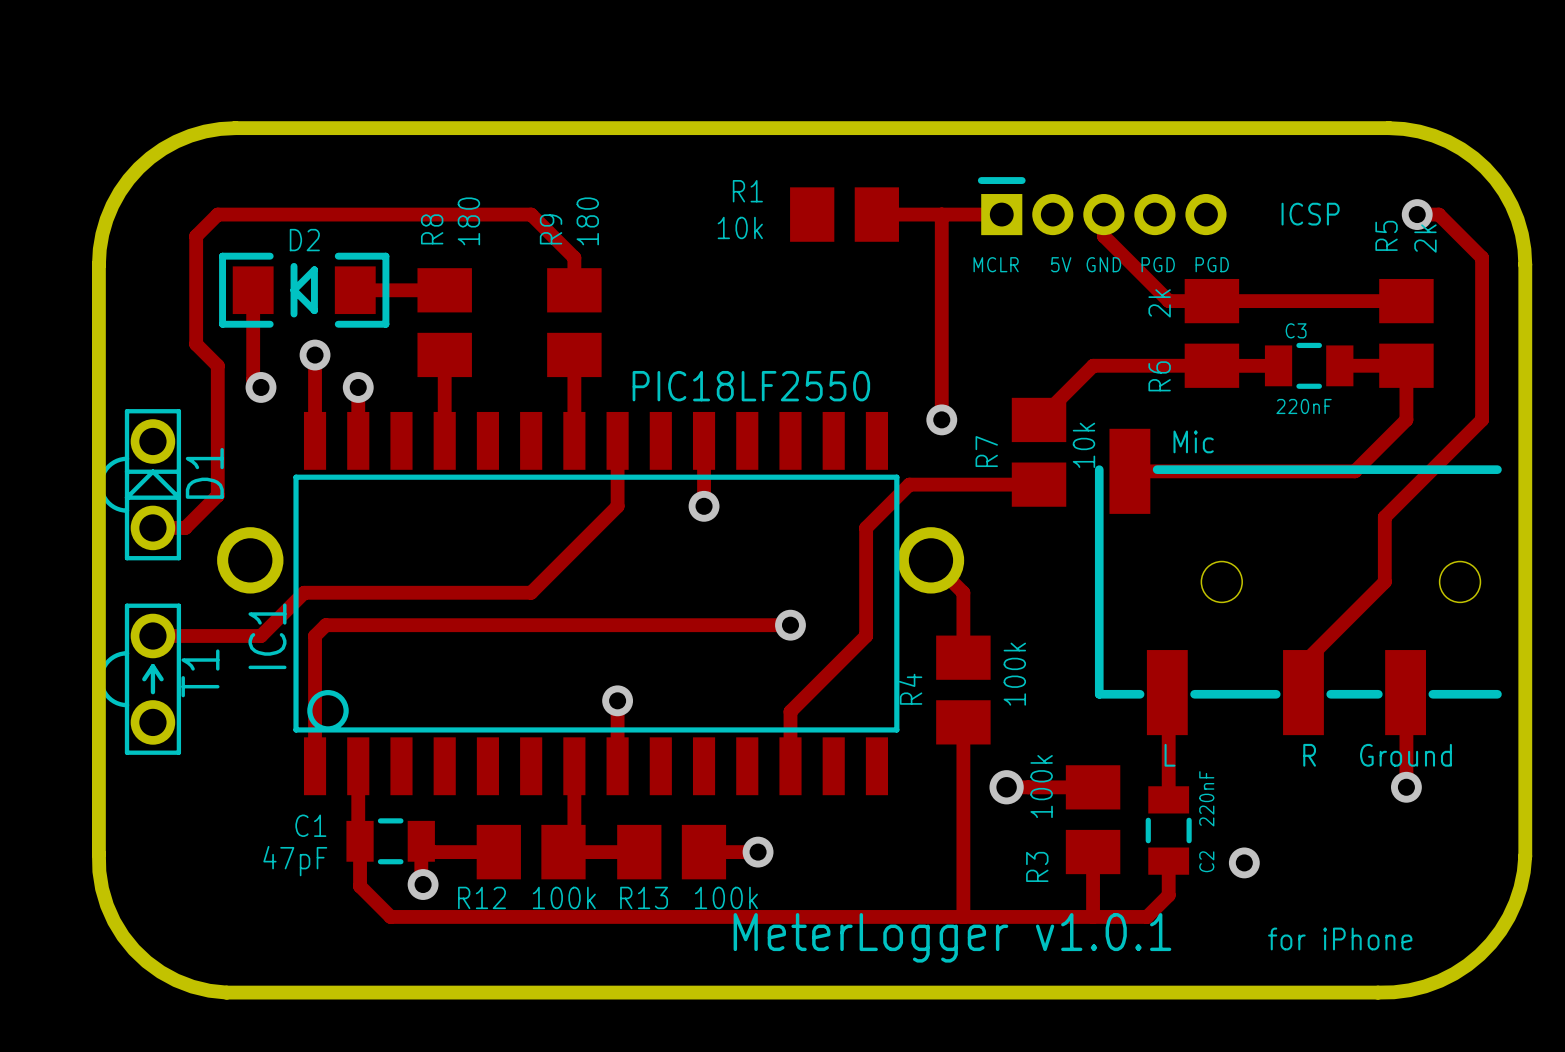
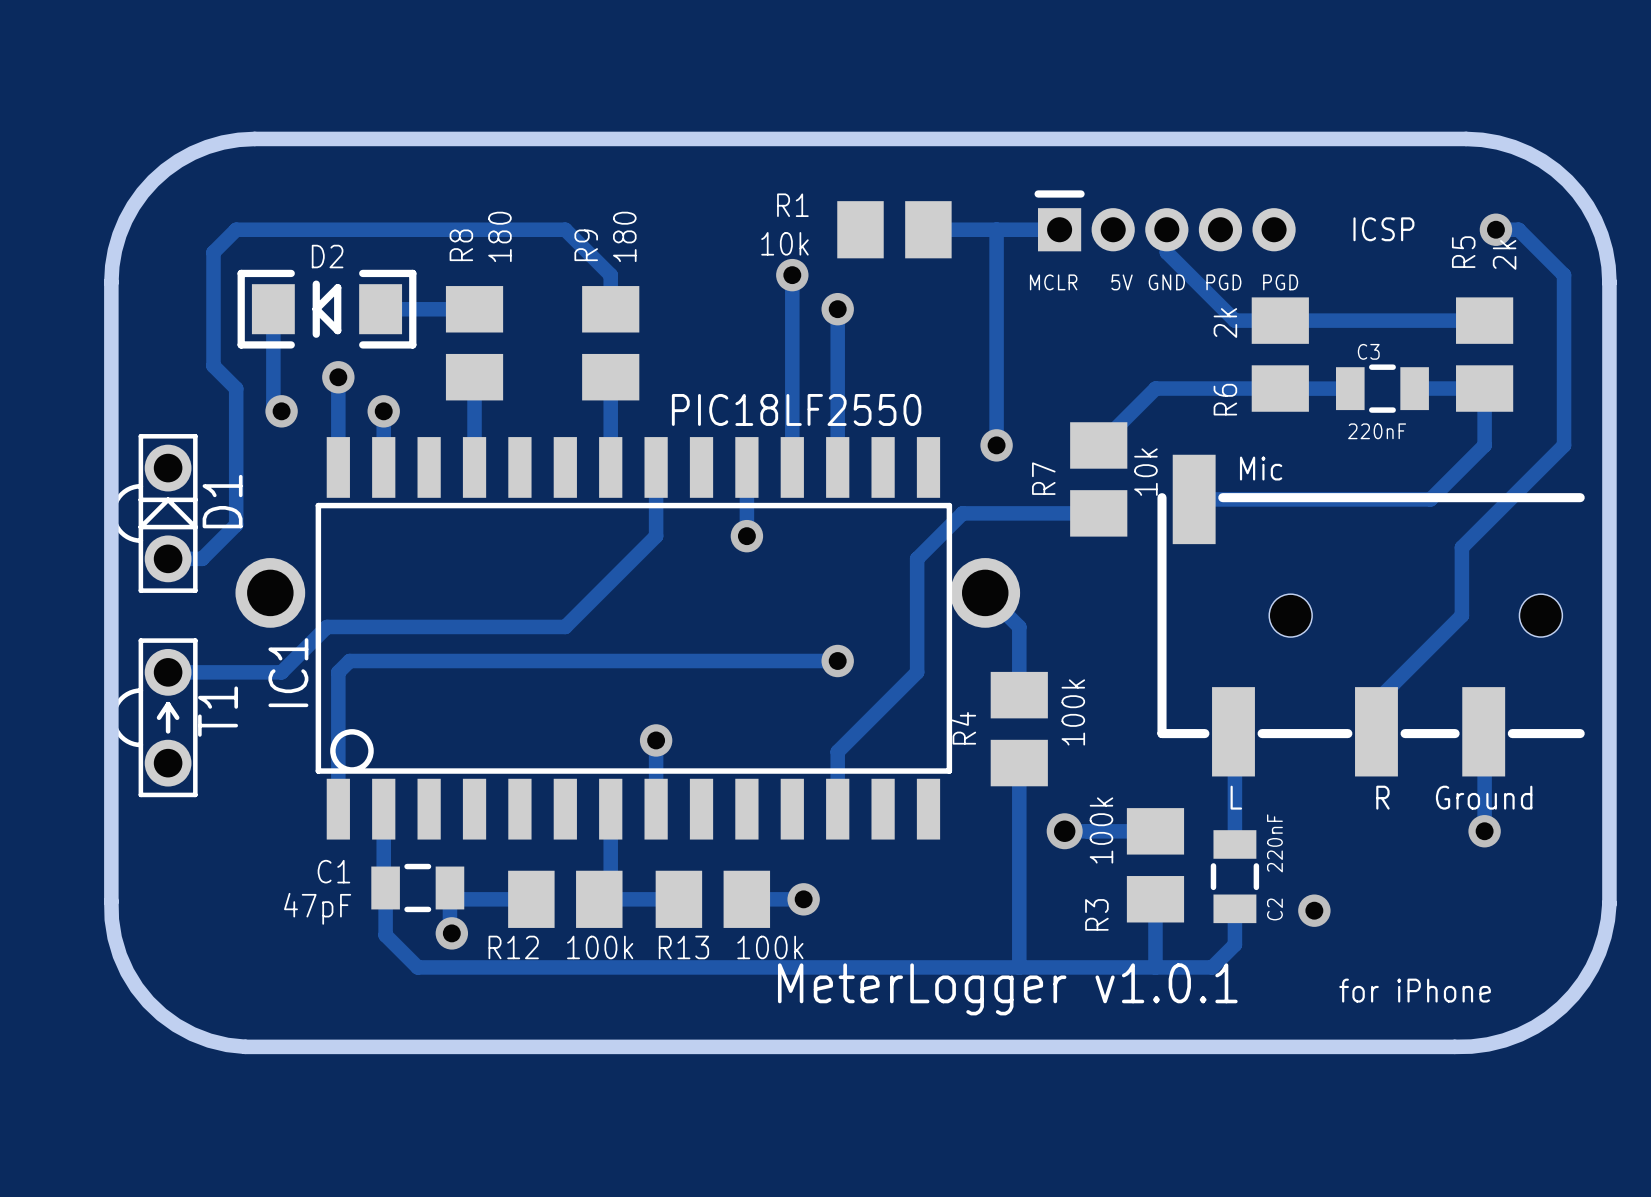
track: none -> (792, 275) (792, 467)
via: none -> (792, 275)
track: none -> (837, 309) (837, 467)
via: none -> (837, 309)

